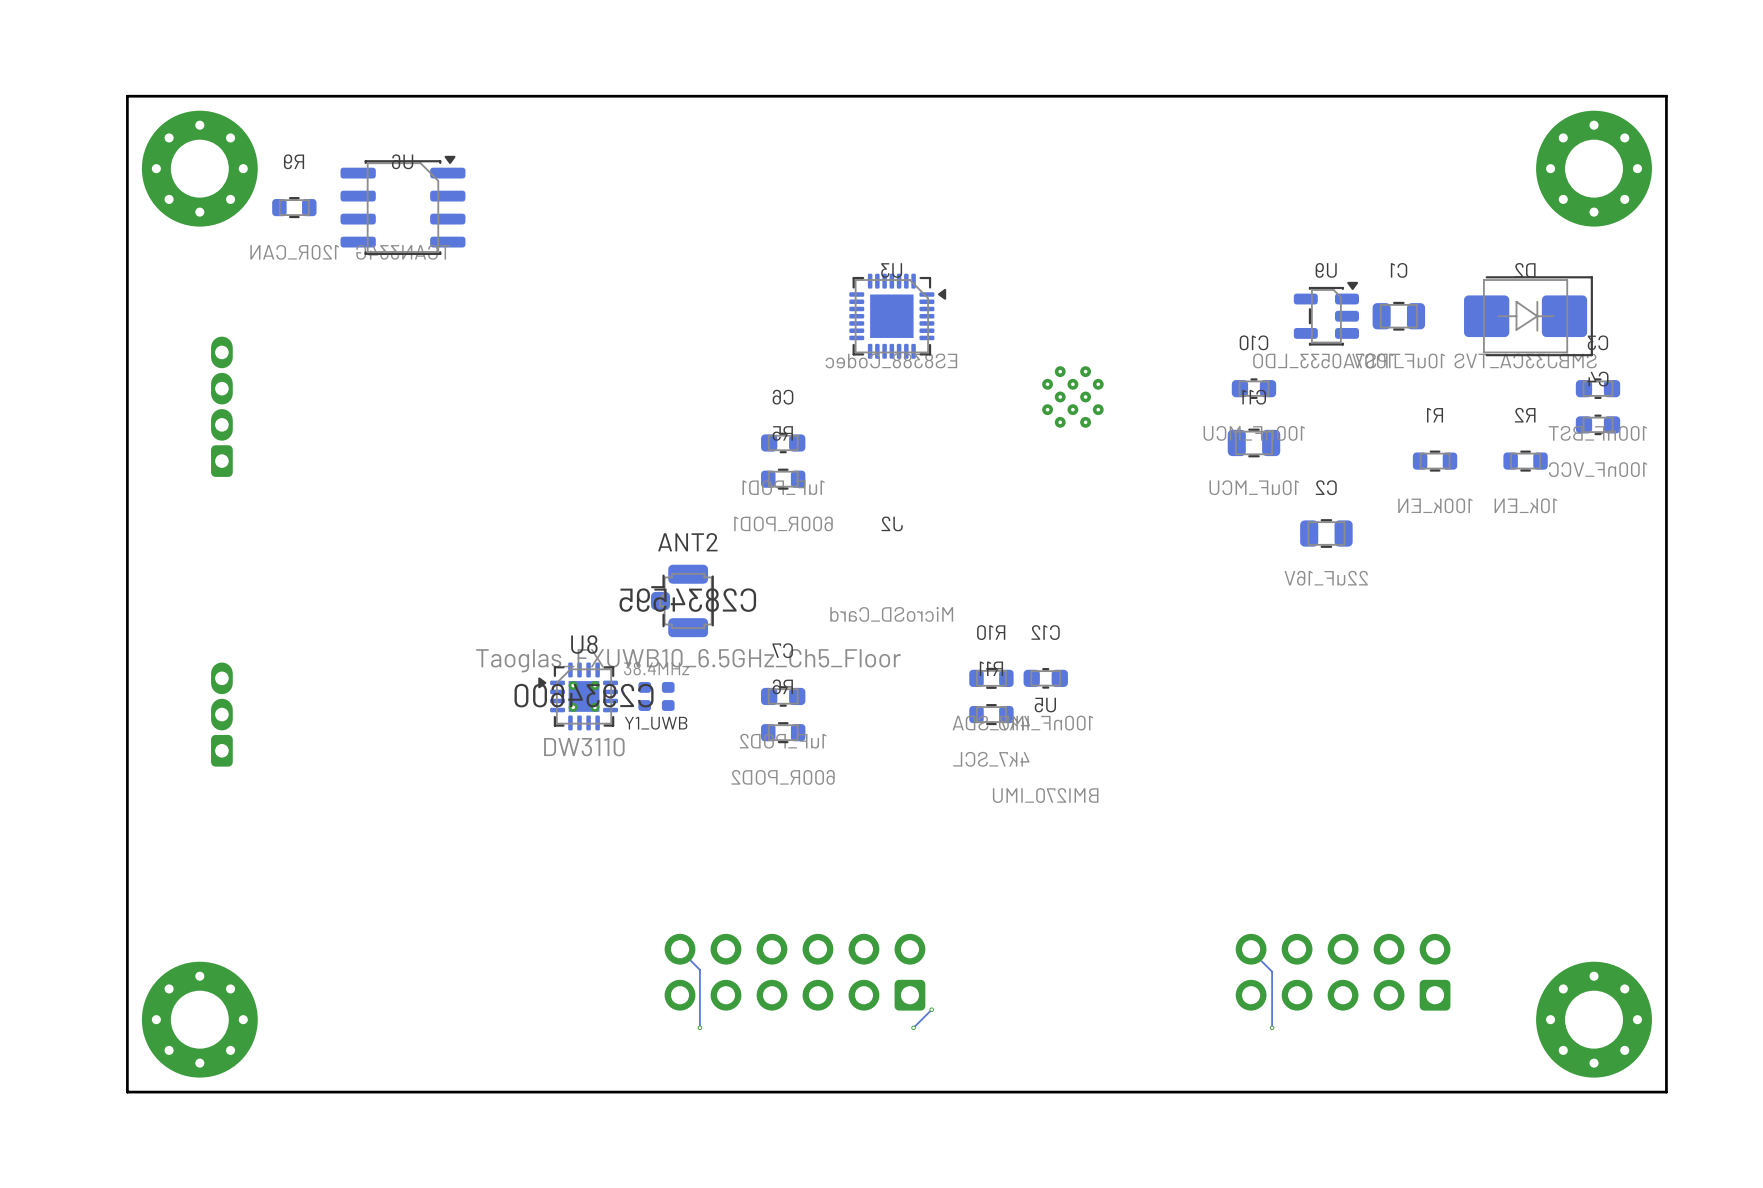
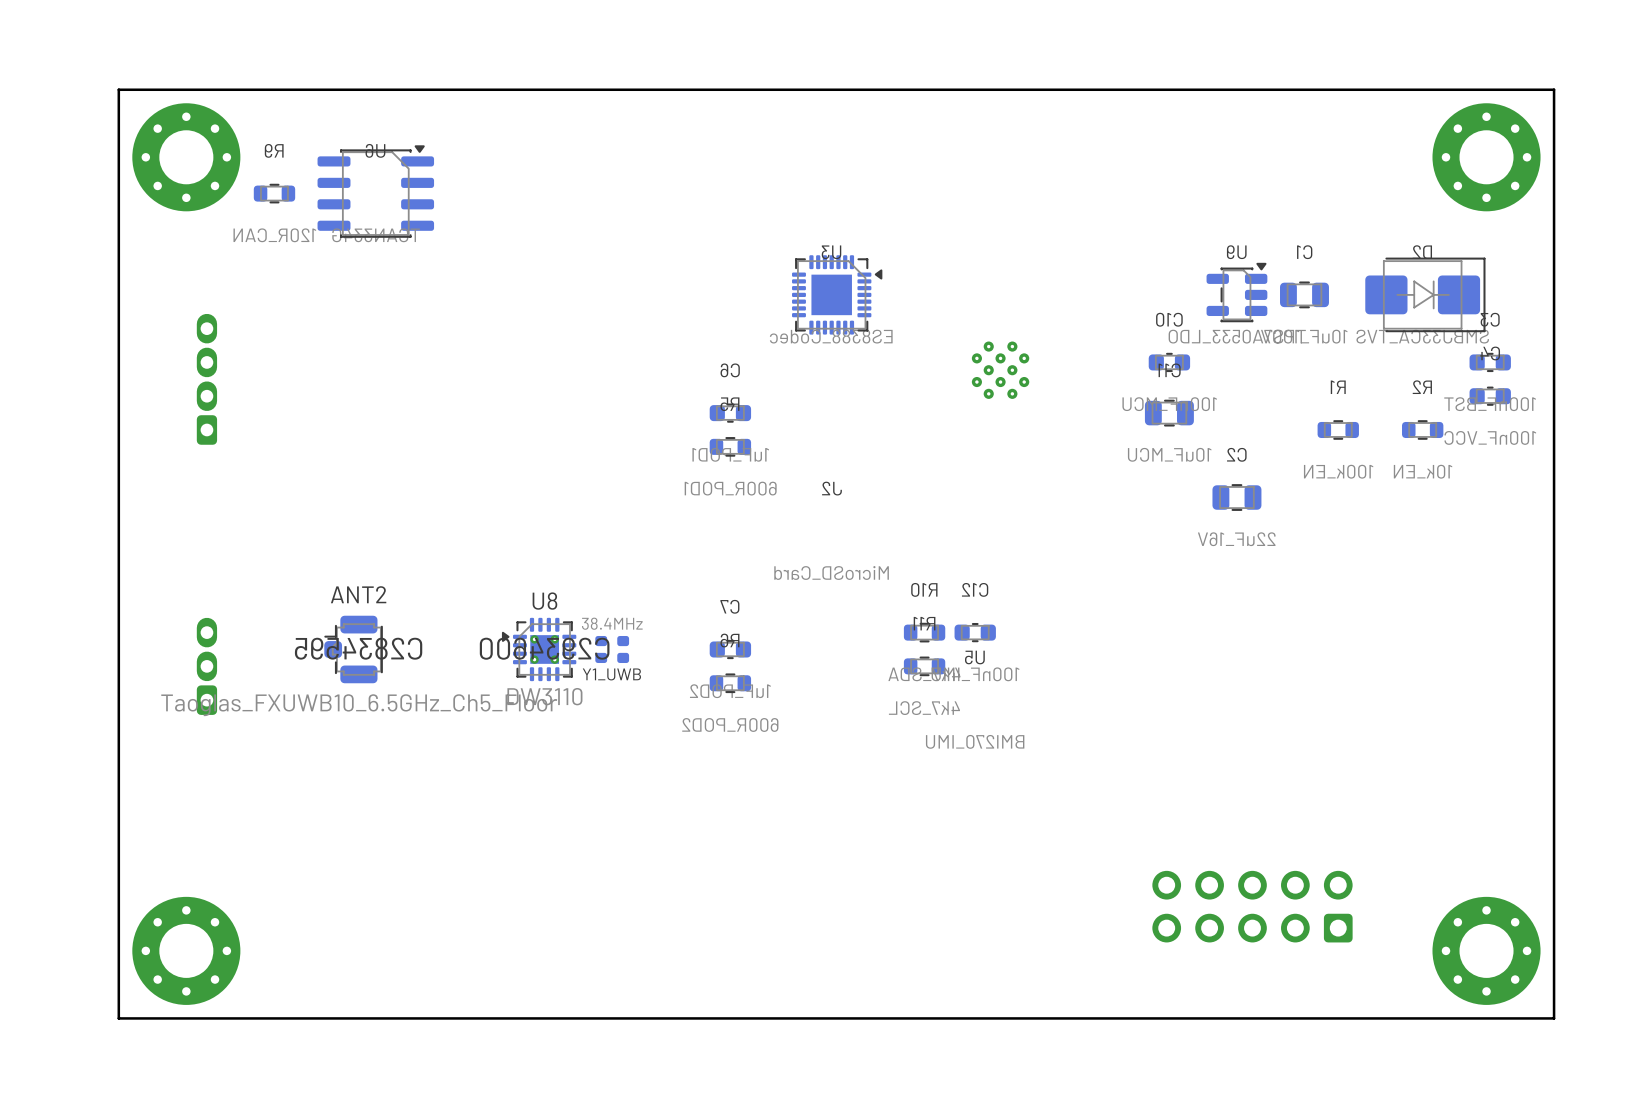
ANT2 position: (682, 600) -> (353, 649)
track: (680, 949) (699, 969) (699, 1027) -> none
track: (1250, 949) (1272, 971) (1272, 1027) -> none
part: (794, 972) -> none
track: (931, 1009) (913, 1027) -> none
via: (931, 1009) -> none
via: (699, 1027) -> none
via: (913, 1027) -> none
via: (1272, 1027) -> none

